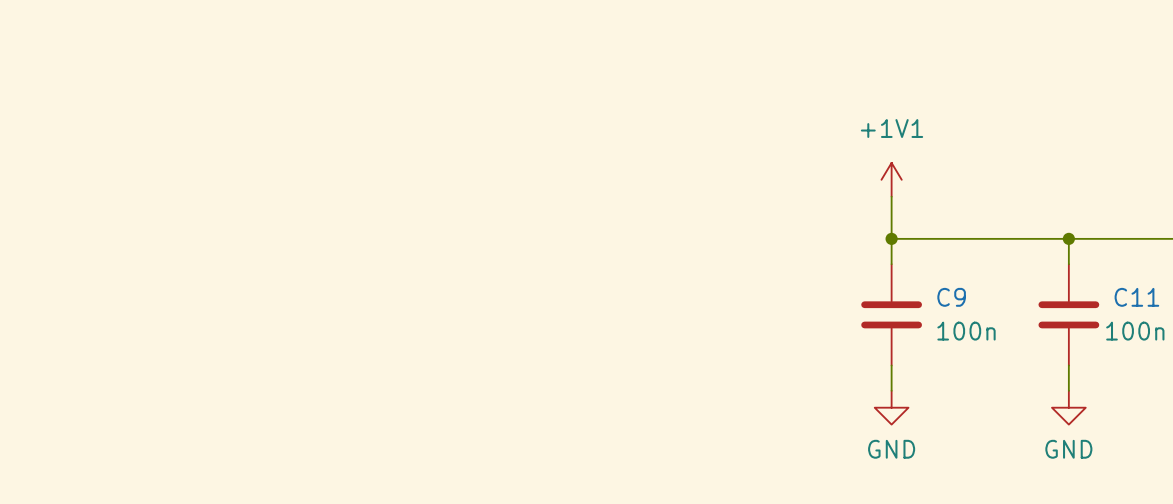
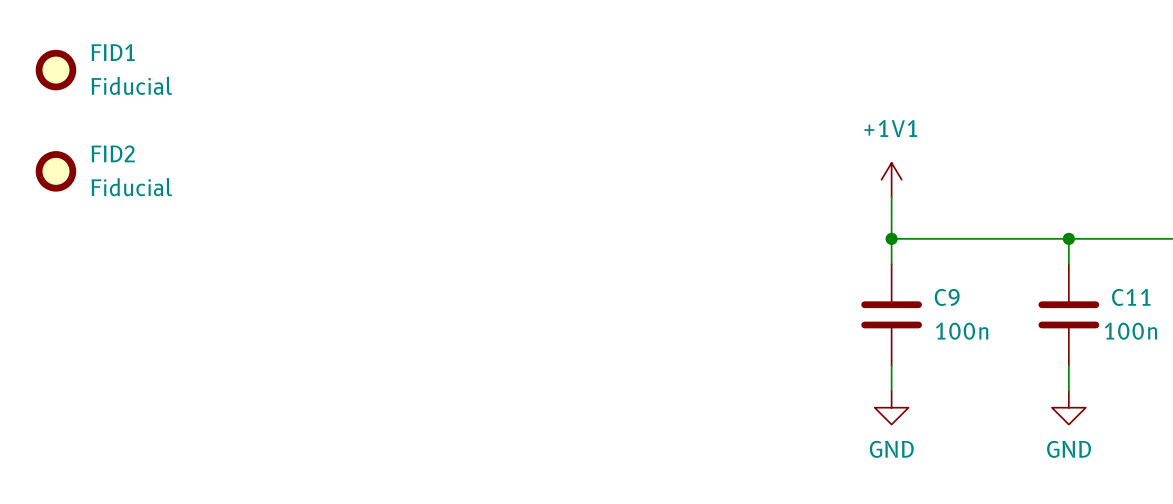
FID1: none -> Fiducial (55, 70)
FID2: none -> Fiducial (55, 171)

